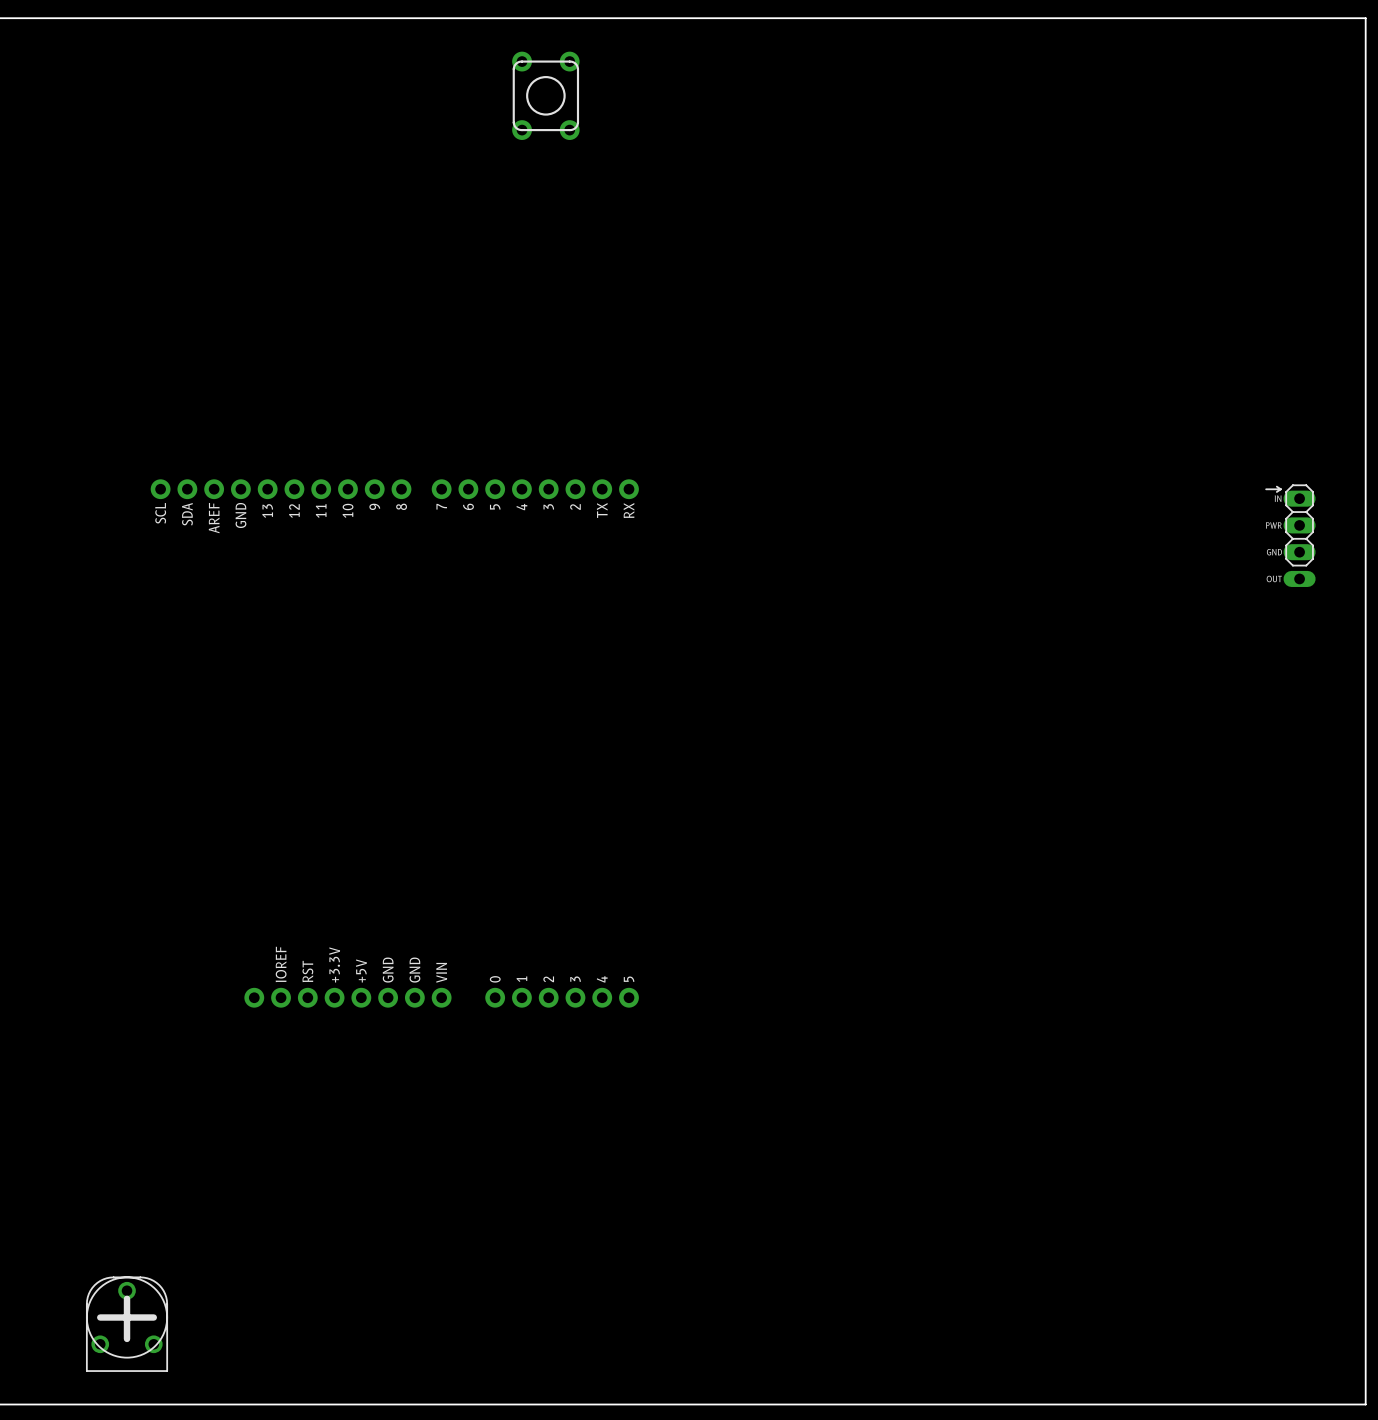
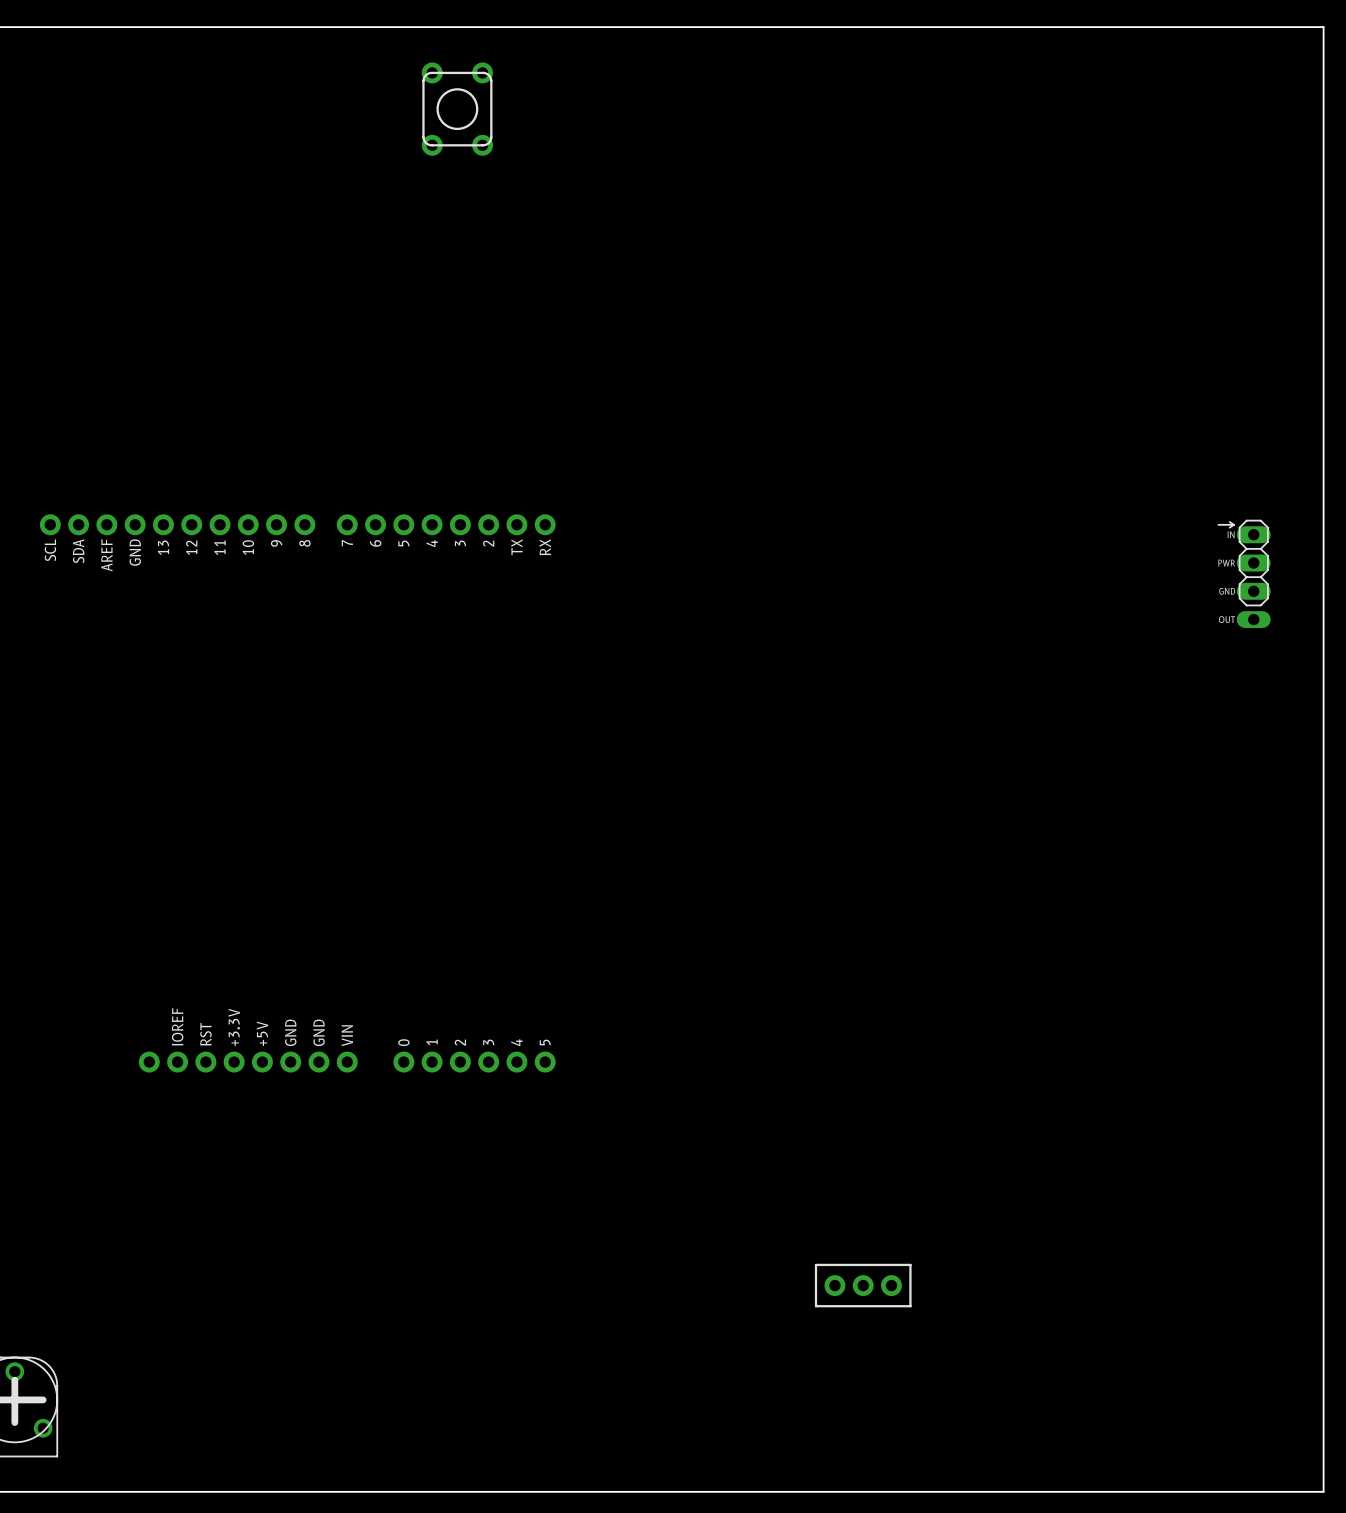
part: none -> (863, 1285)

